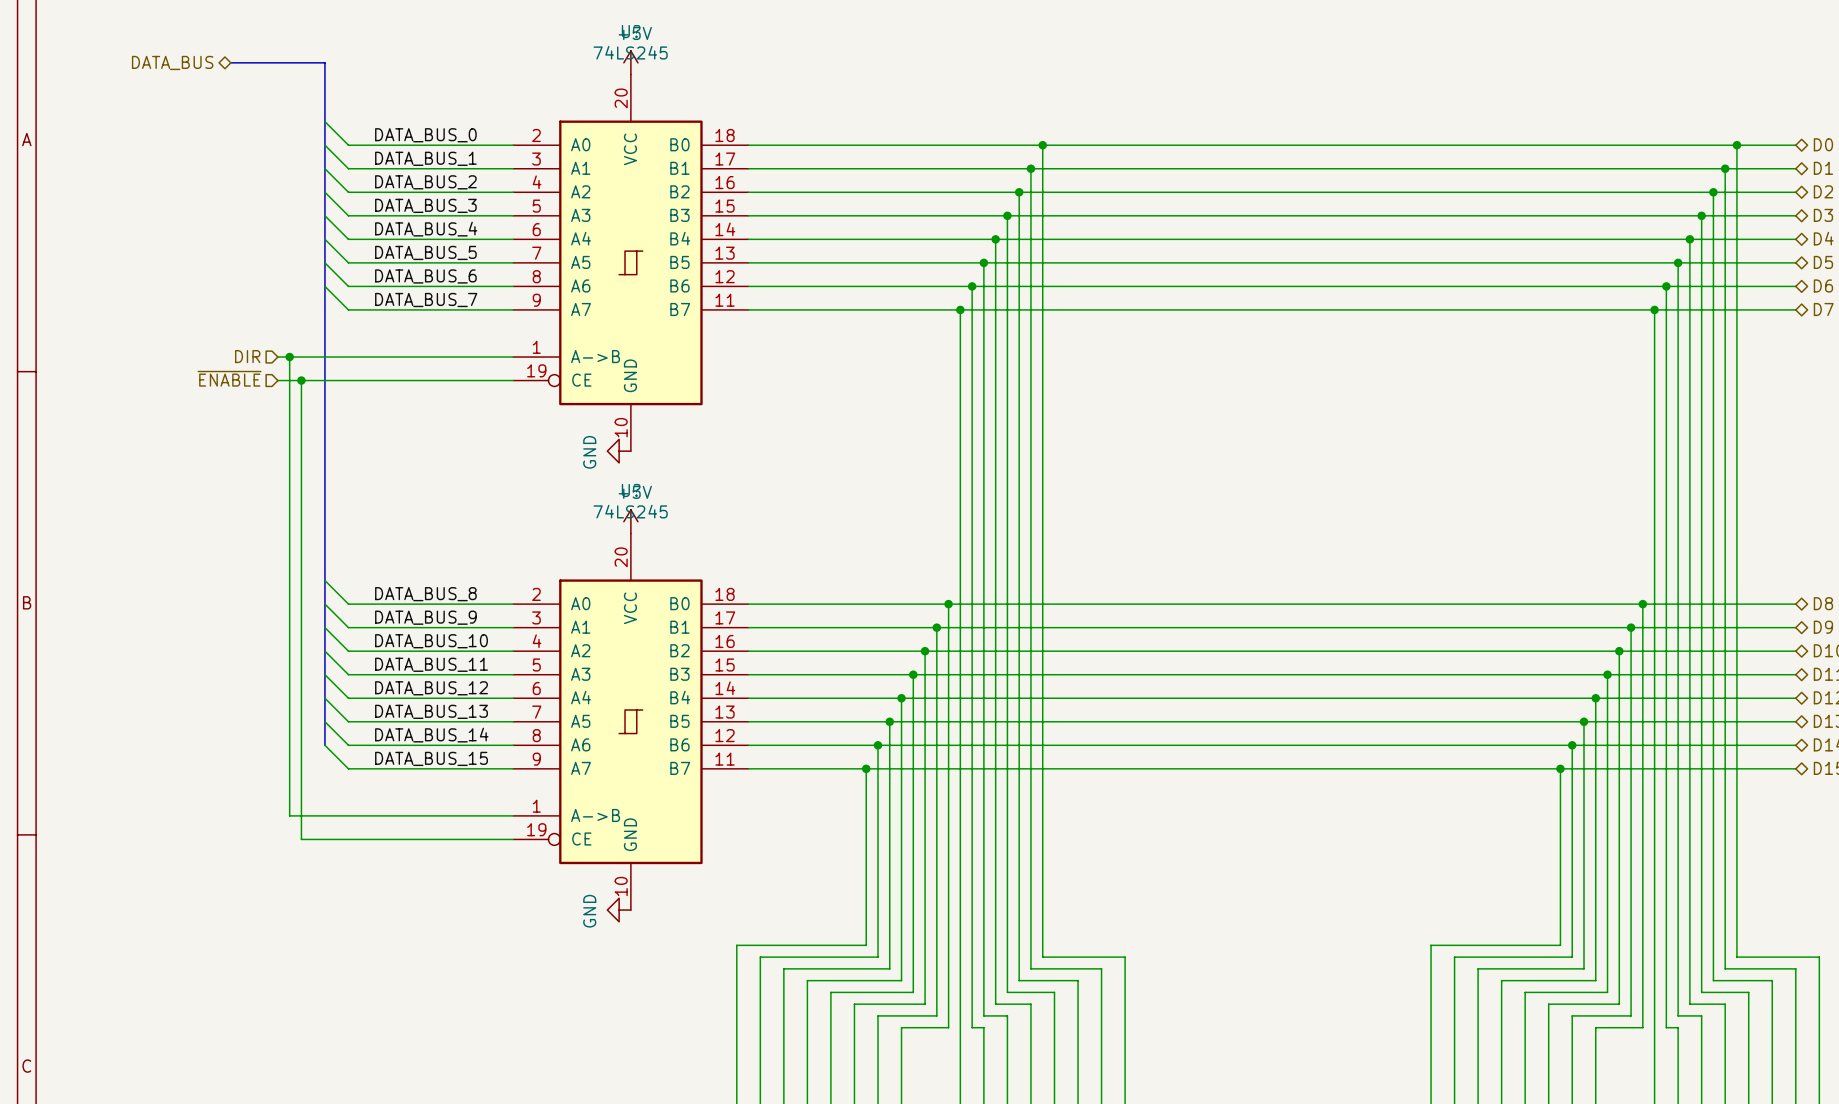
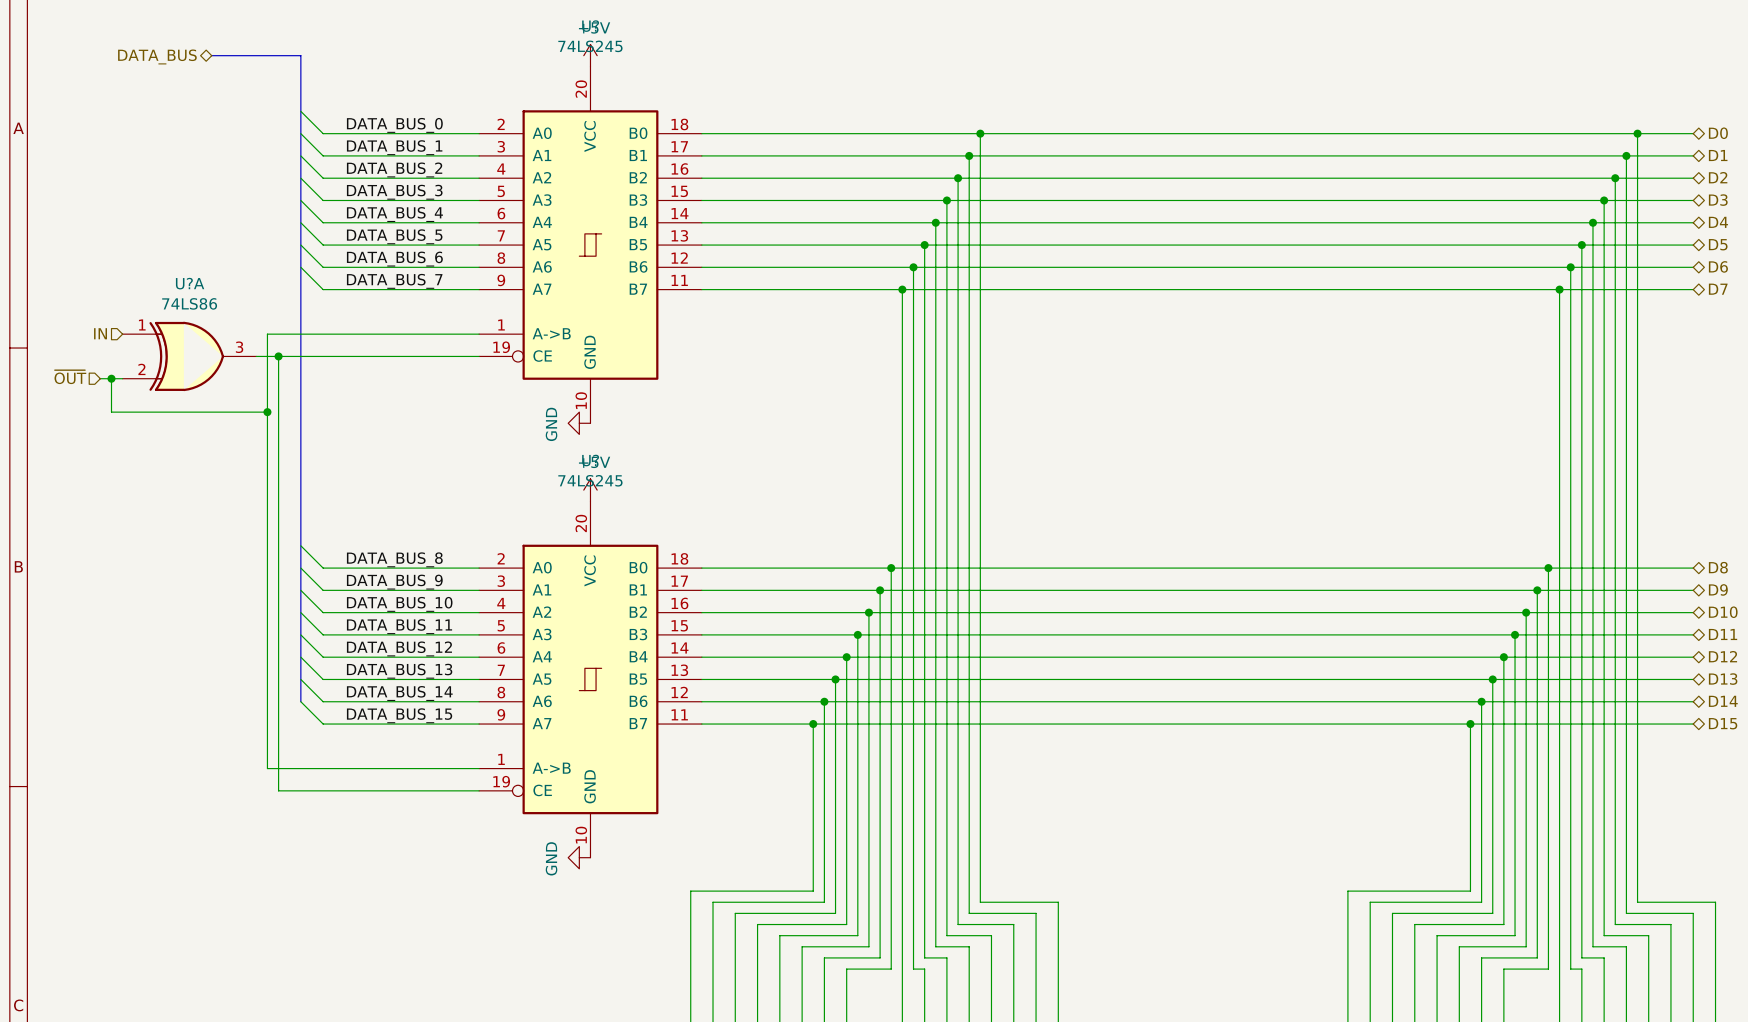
hierarchical label: none -> IN (100, 333)
hierarchical label: DIR (247, 356) -> none
wire: (277, 357) (289, 357) -> none
junction: (289, 357) -> none
hierarchical label: ~{ENABLE} (229, 378) -> none
U?A: none -> 74LS86 (189, 356)
hierarchical label: none -> ~{OUT} (70, 377)
wire: none -> (100, 378) (122, 378)
wire: none -> (111, 378) (111, 412) (267, 412)
junction: none -> (111, 378)
junction: none -> (267, 412)

